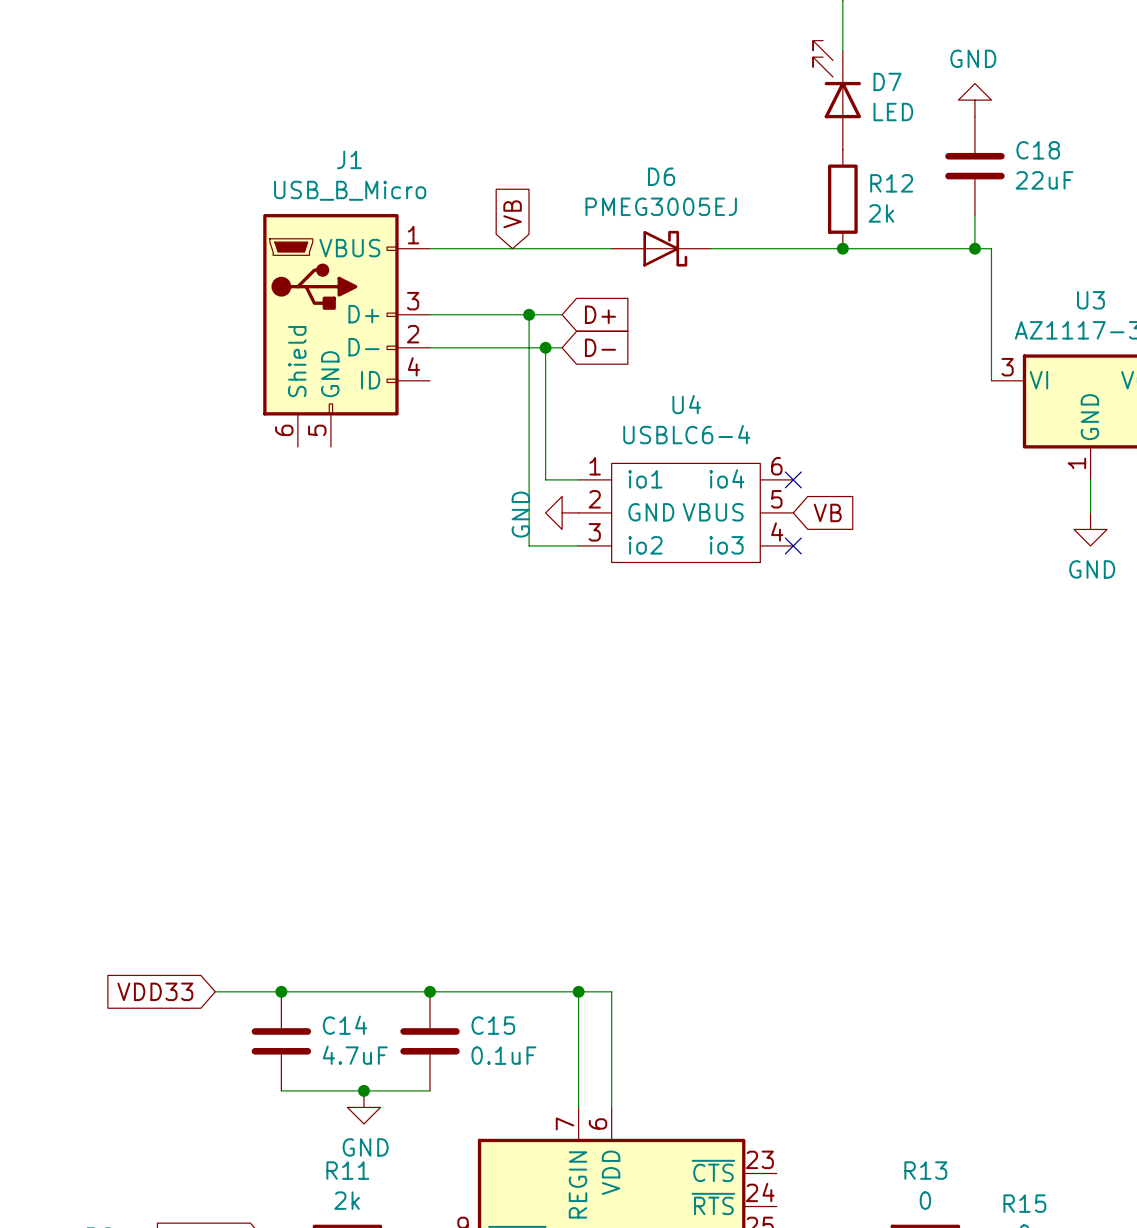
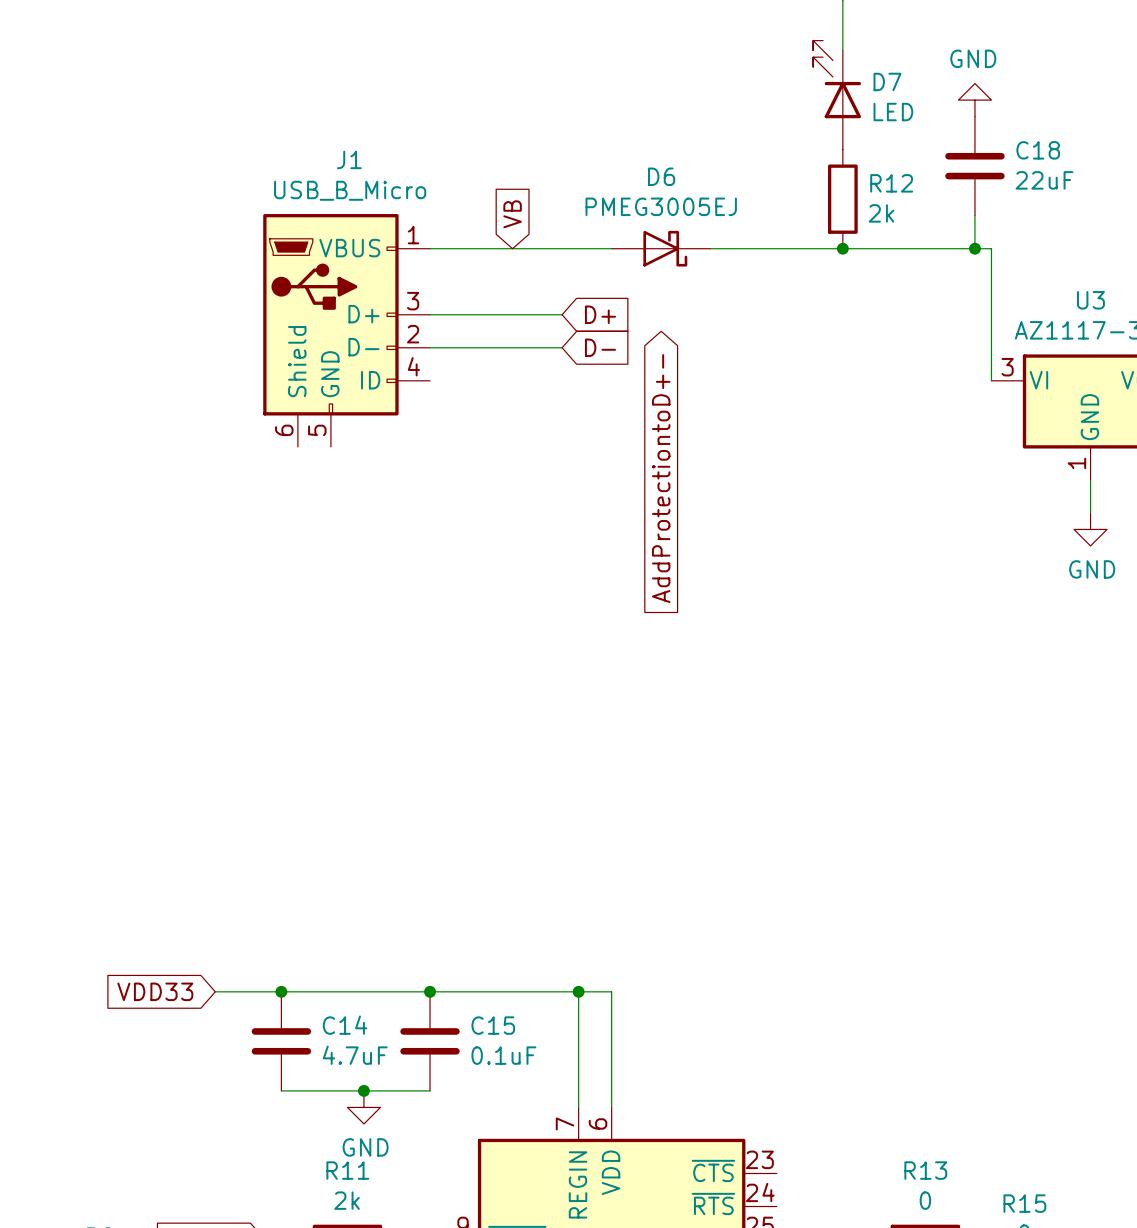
wire: (529, 314) (529, 545) (578, 545) -> none
junction: (529, 314) -> none
wire: (545, 347) (545, 479) (578, 479) -> none
junction: (545, 347) -> none
global label: none -> AddProtectiontoD+- (661, 478)
no-connect mark: (793, 479) -> none
power symbol: GND (562, 512) -> none
U4: USBLC6-4 (685, 512) -> none
global label: VB (827, 512) -> none
no-connect mark: (793, 545) -> none

